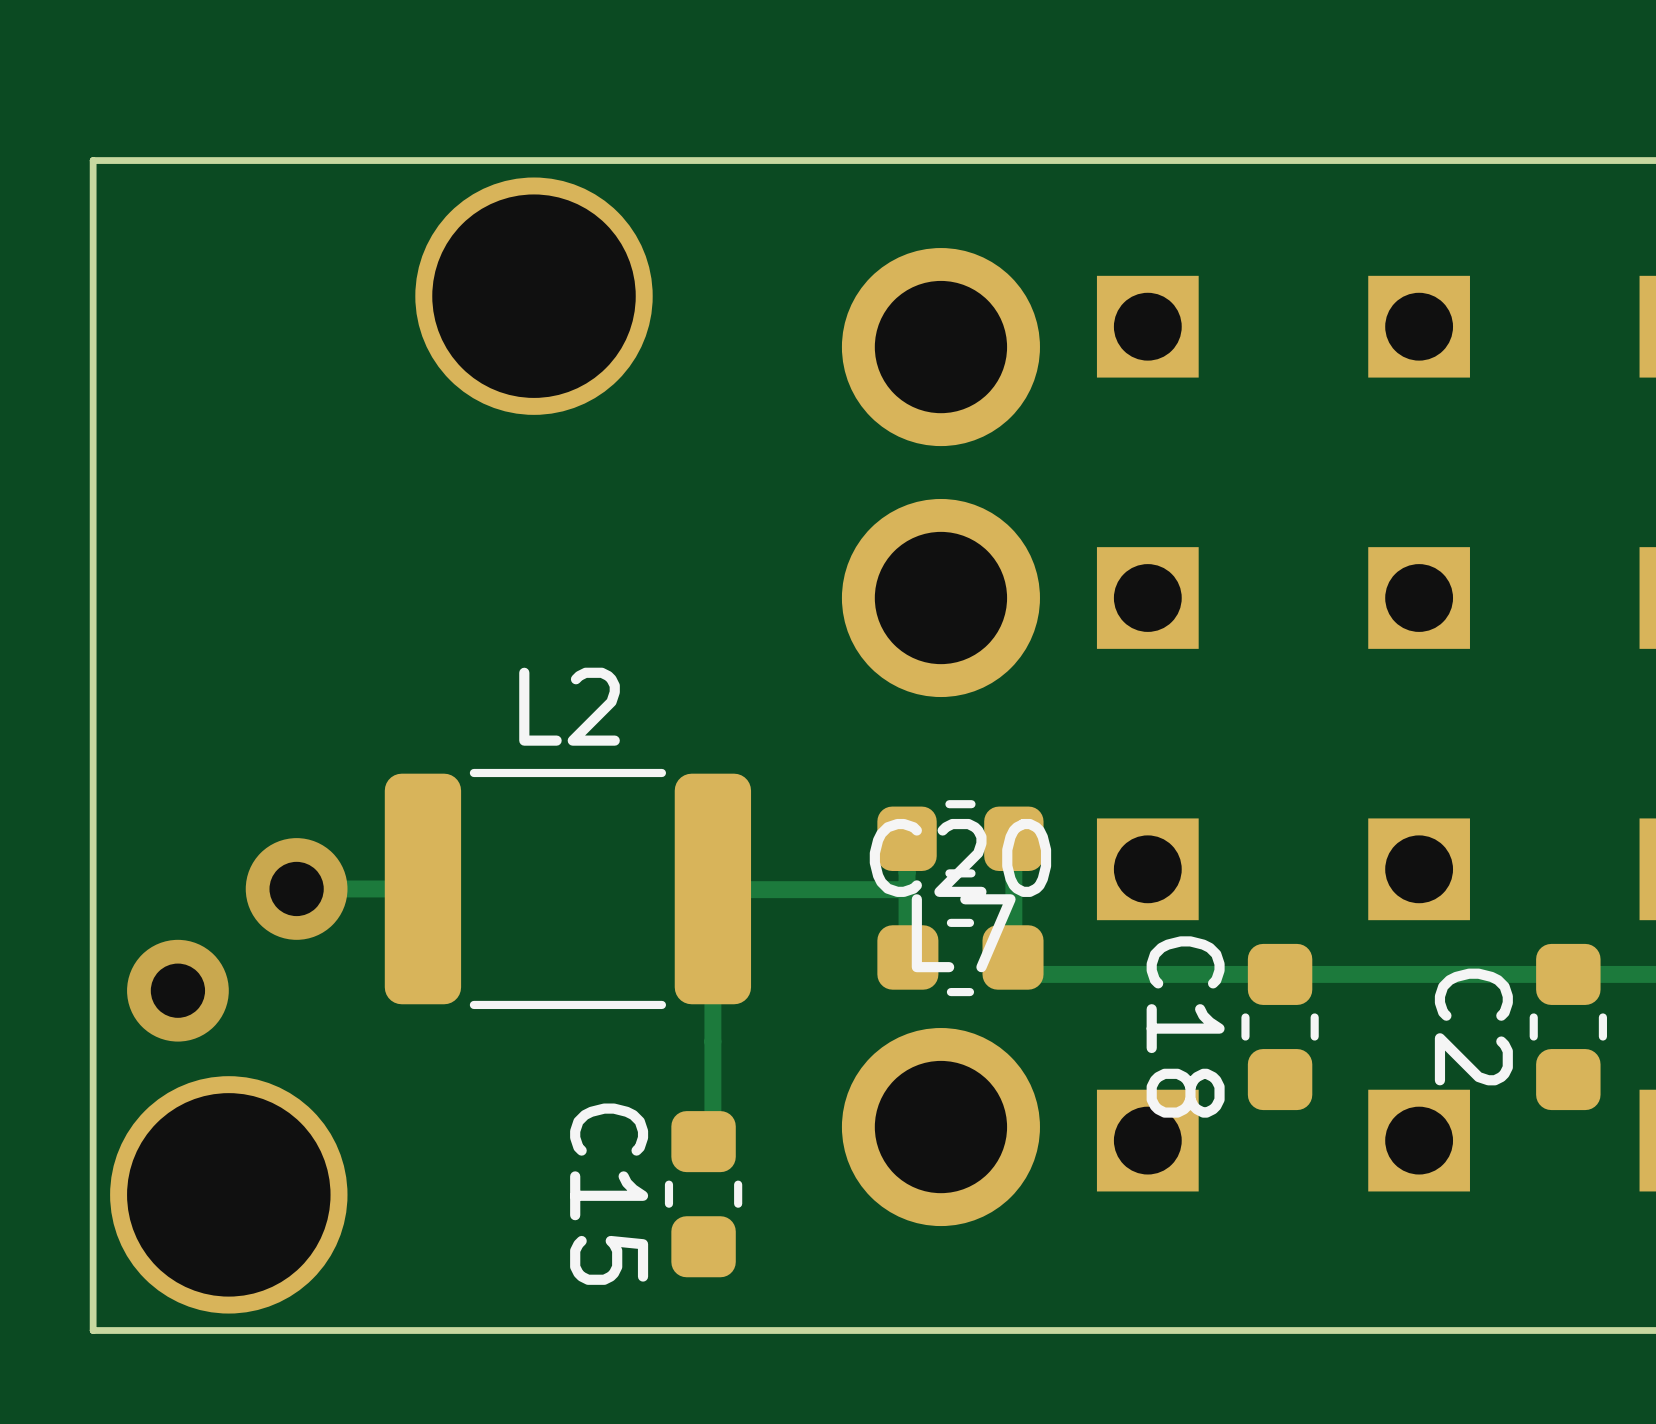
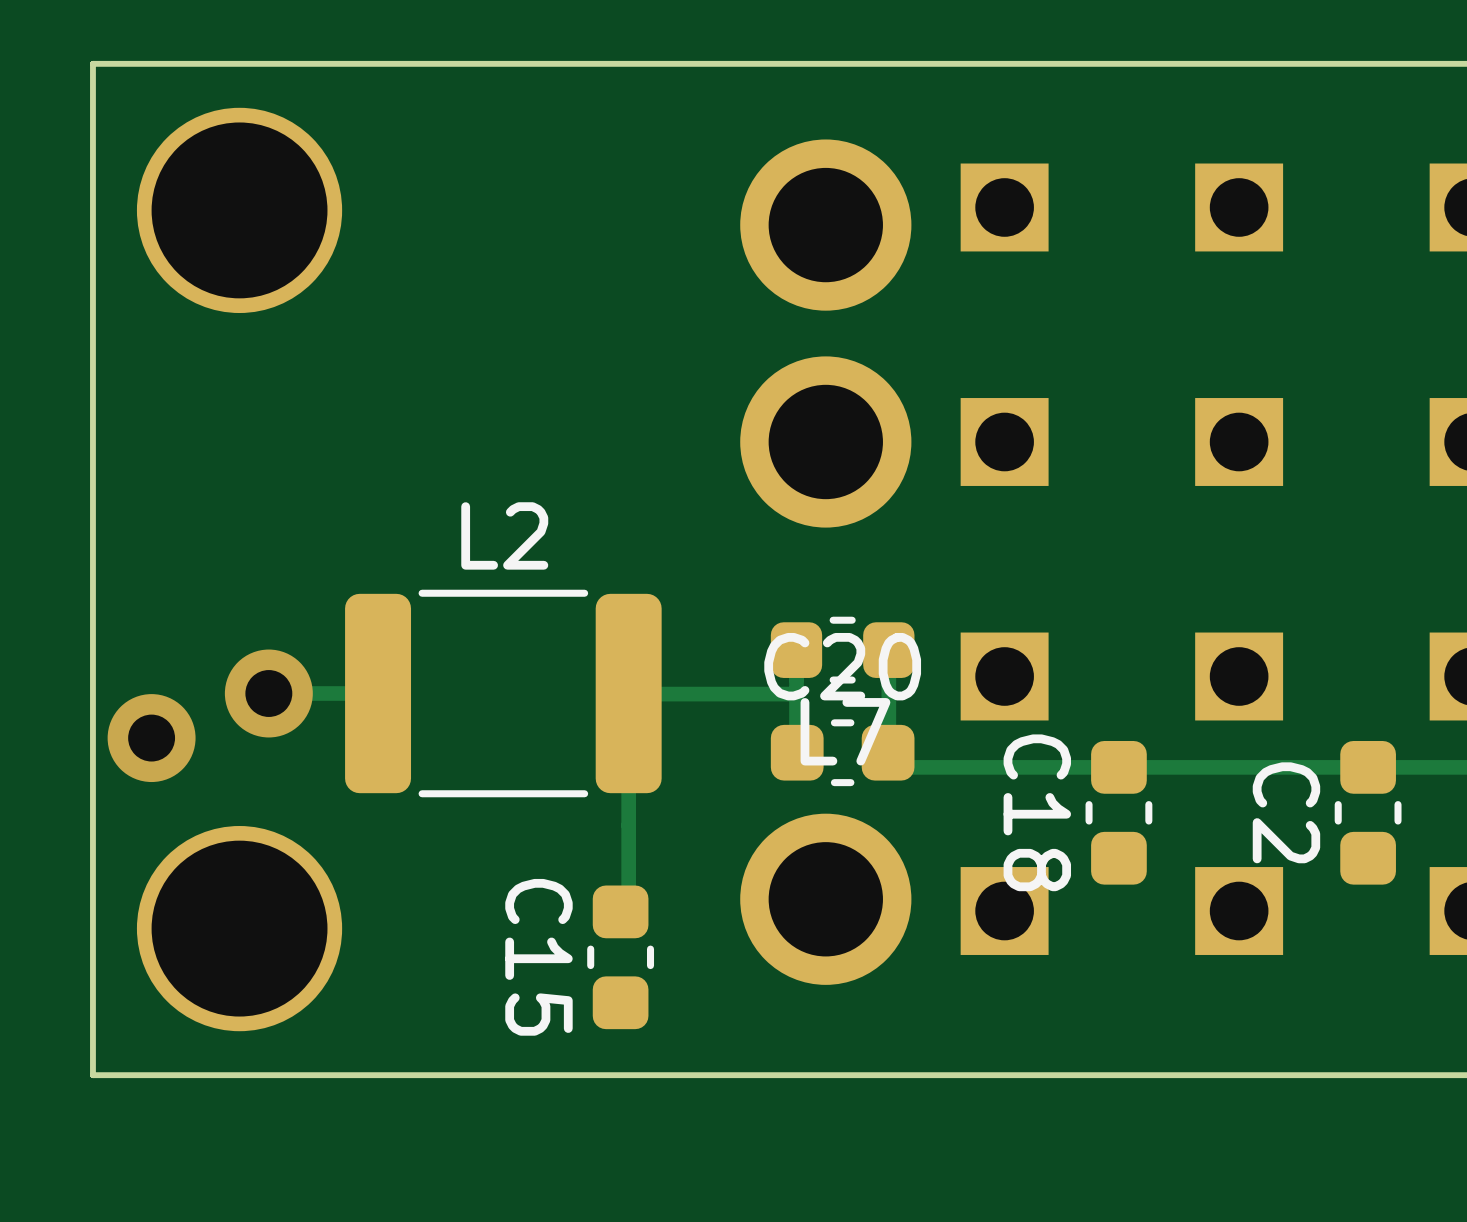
part position: (534, 296) -> (239, 210)
via position: (177, 990) -> (151, 738)
part position: (228, 1194) -> (239, 928)

